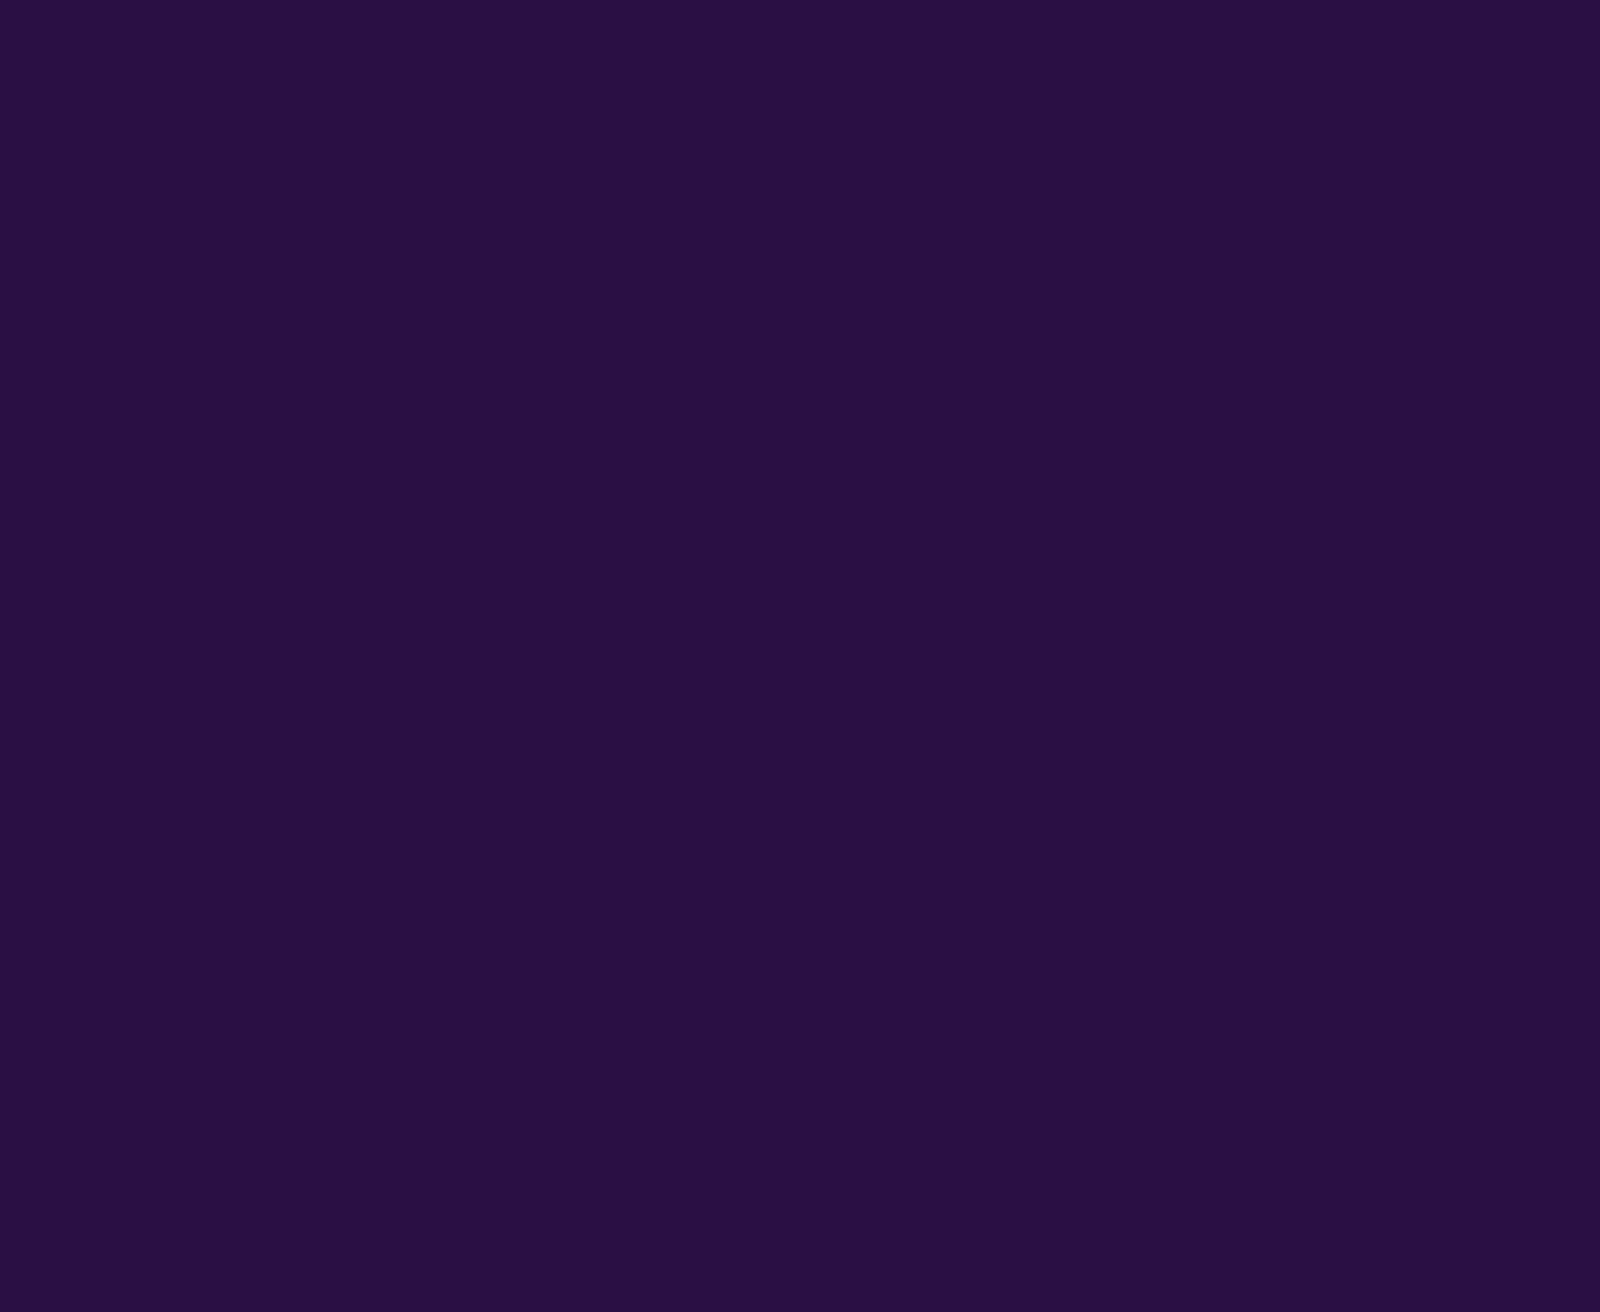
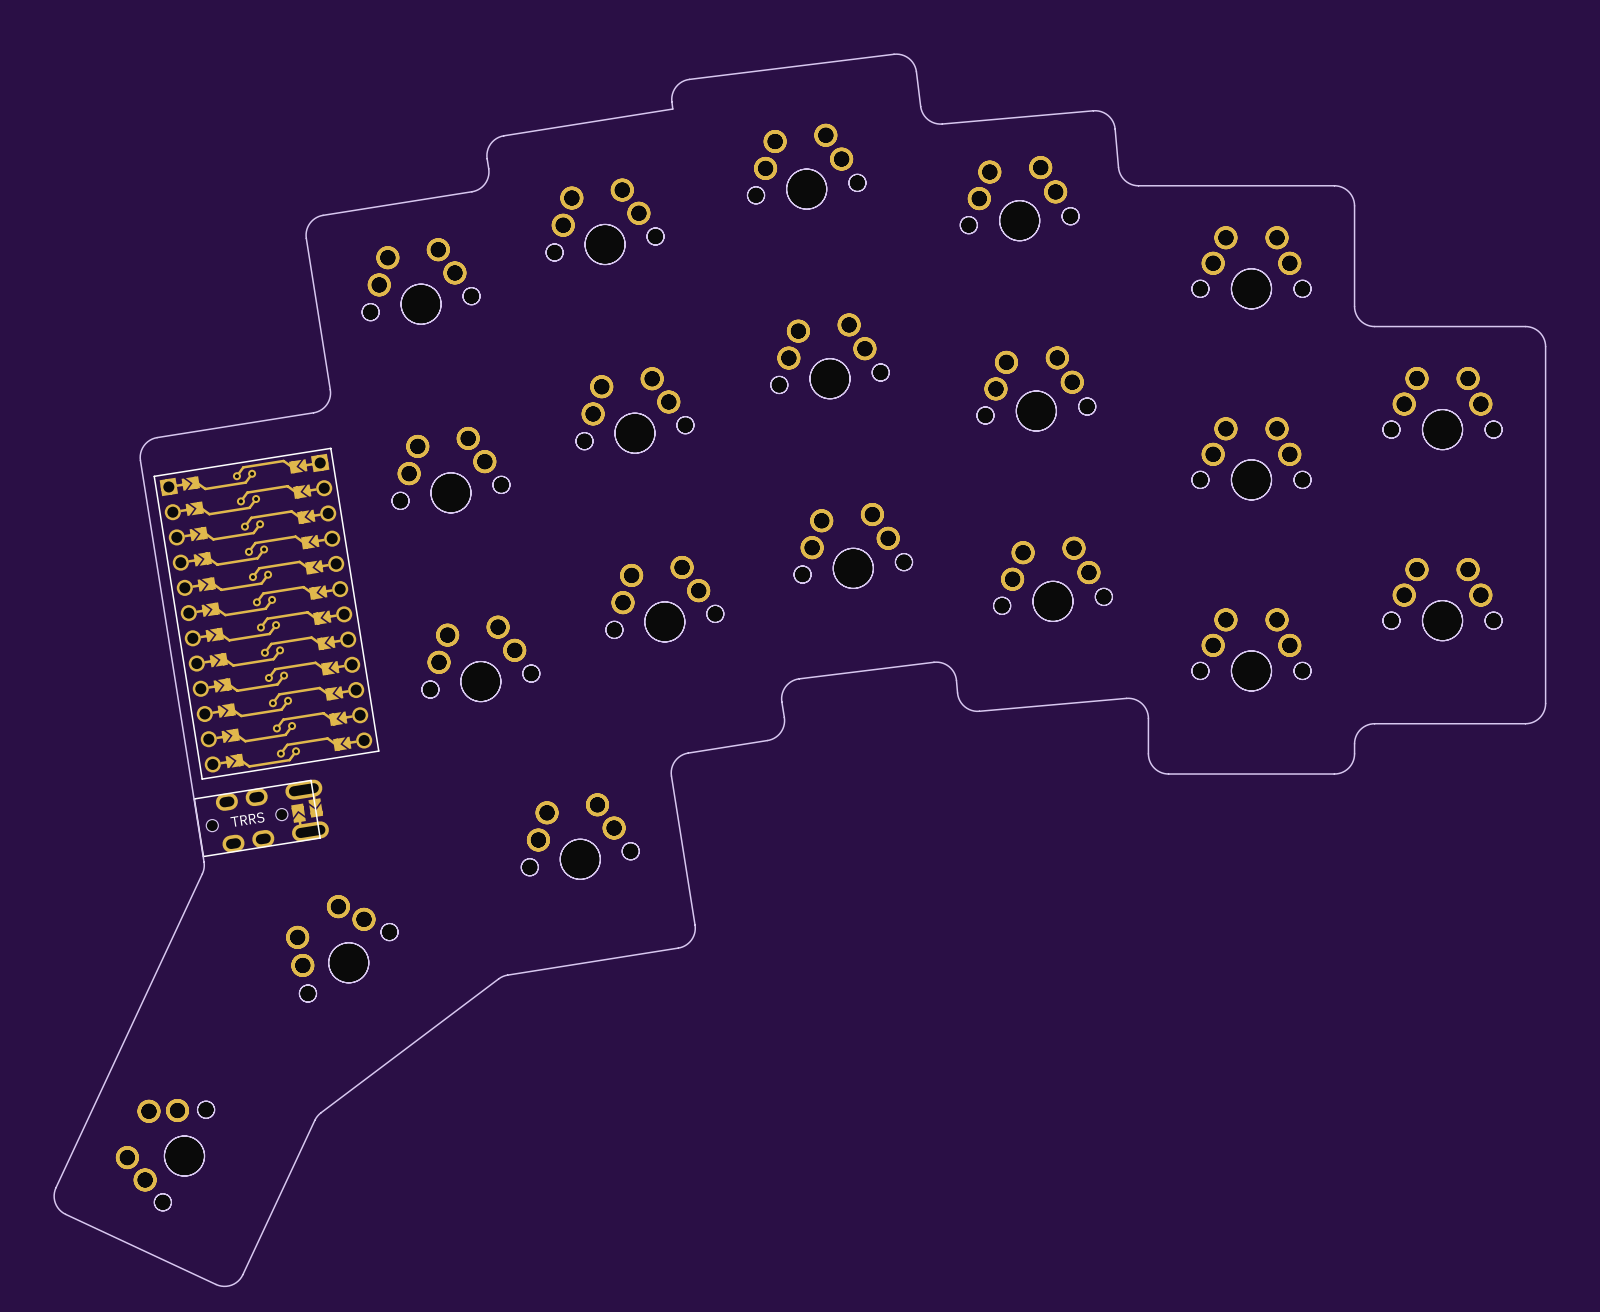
board edge: none -> (894, 54) (686, 79) (677, 85) (673, 91) (672, 109) (498, 137) (492, 141) (487, 150) (488, 171) (487, 179) (476, 190) (316, 217) (308, 225) (306, 236) (330, 389) (326, 404) (315, 412) (157, 437) (149, 440) (144, 445) (140, 452) (140, 460) (204, 868) (56, 1187) (54, 1195) (55, 1203) (63, 1213) (216, 1284) (226, 1286) (236, 1282) (242, 1274) (317, 1116) (498, 978) (507, 975) (678, 948) (690, 941) (695, 927) (671, 776) (672, 765) (678, 757) (685, 753) (767, 740) (775, 737) (784, 724) (782, 692) (787, 684) (794, 679) (938, 662) (945, 664) (952, 669) (956, 678) (959, 700) (964, 706) (974, 711) (1133, 699) (1143, 705) (1147, 713) (1148, 753) (1150, 762) (1157, 770) (1168, 774) (1336, 773) (1345, 770) (1351, 764) (1356, 735) (1362, 728) (1370, 724) (1525, 723) (1534, 721) (1541, 716) (1545, 703) (1545, 346) (1539, 332) (1525, 326) (1374, 326) (1365, 324) (1358, 318) (1354, 308) (1354, 203) (1351, 195) (1345, 188) (1334, 185) (1133, 185) (1124, 180) (1119, 172) (1114, 126) (1111, 119) (1103, 112) (1093, 110) (934, 123) (927, 119) (921, 111) (913, 64) (906, 56) (894, 54)
part: none -> (806, 166)
part: none -> (1019, 198)
part: none -> (1019, 198)
part: none -> (605, 221)
part: none -> (605, 221)
part: none -> (1251, 267)
part: none -> (1251, 267)
part: none -> (421, 281)
part: none -> (421, 281)
part: none -> (830, 356)
part: none -> (1036, 388)
part: none -> (1036, 388)
part: none -> (1442, 408)
part: none -> (1442, 408)
part: none -> (634, 410)
part: none -> (634, 410)
part: none -> (1251, 458)
part: none -> (1251, 458)
part: none -> (450, 469)
part: none -> (450, 469)
part: none -> (853, 545)
part: none -> (853, 545)
part: none -> (1053, 579)
part: none -> (664, 598)
part: none -> (664, 598)
part: none -> (1442, 599)
part: none -> (1442, 599)
part: none -> (266, 613)
part: none -> (1251, 649)
part: none -> (1251, 649)
part: none -> (480, 658)
part: none -> (480, 658)
part: none -> (261, 818)
part: none -> (580, 836)
part: none -> (580, 836)
part: none -> (342, 948)
part: none -> (342, 948)
part: none -> (165, 1154)
part: none -> (165, 1154)

